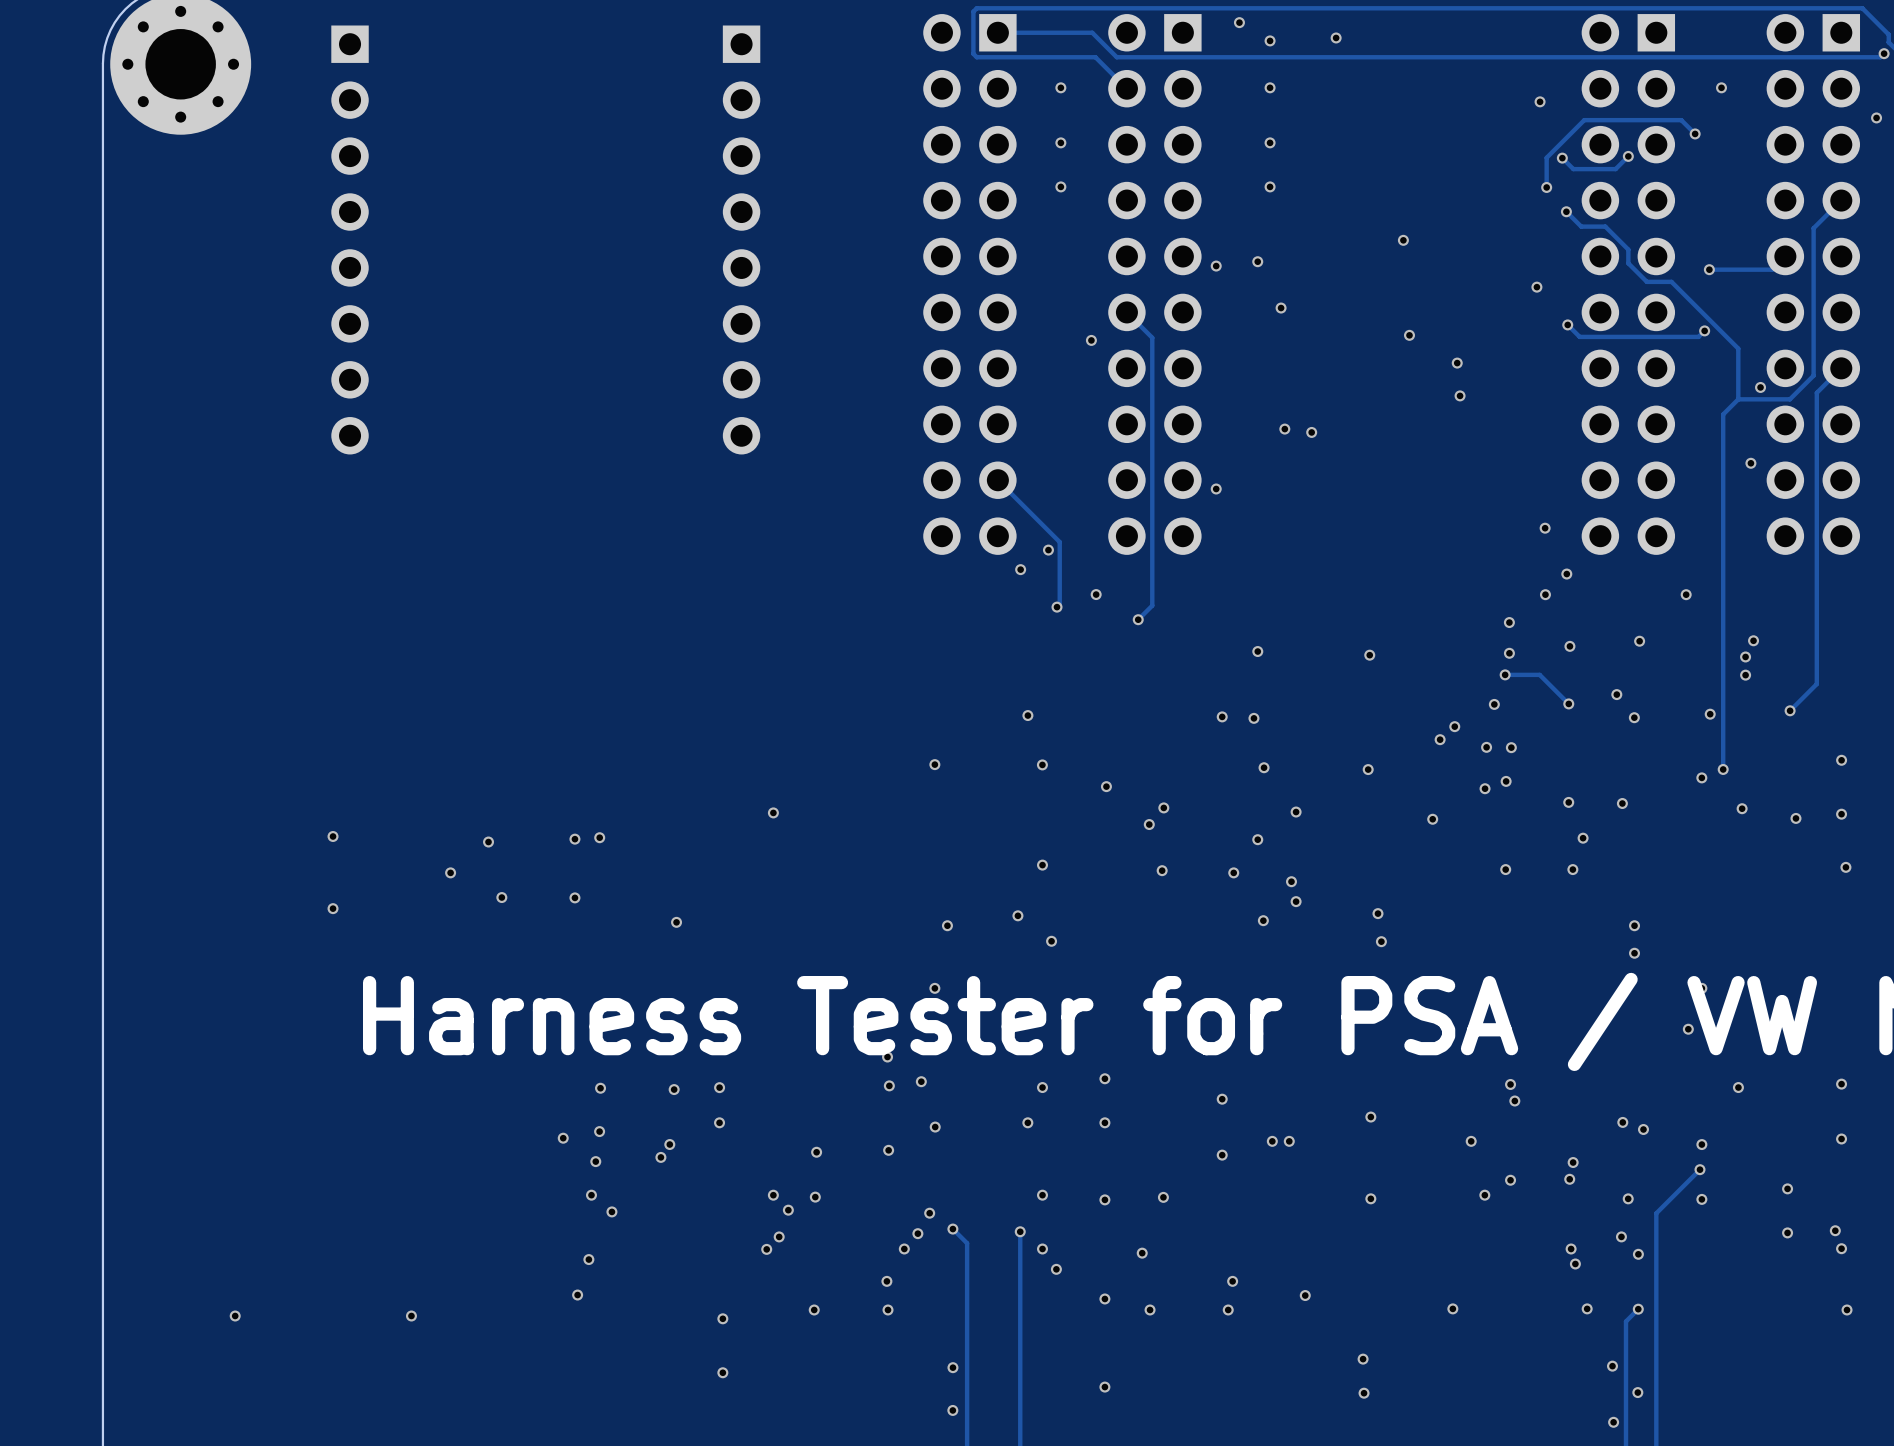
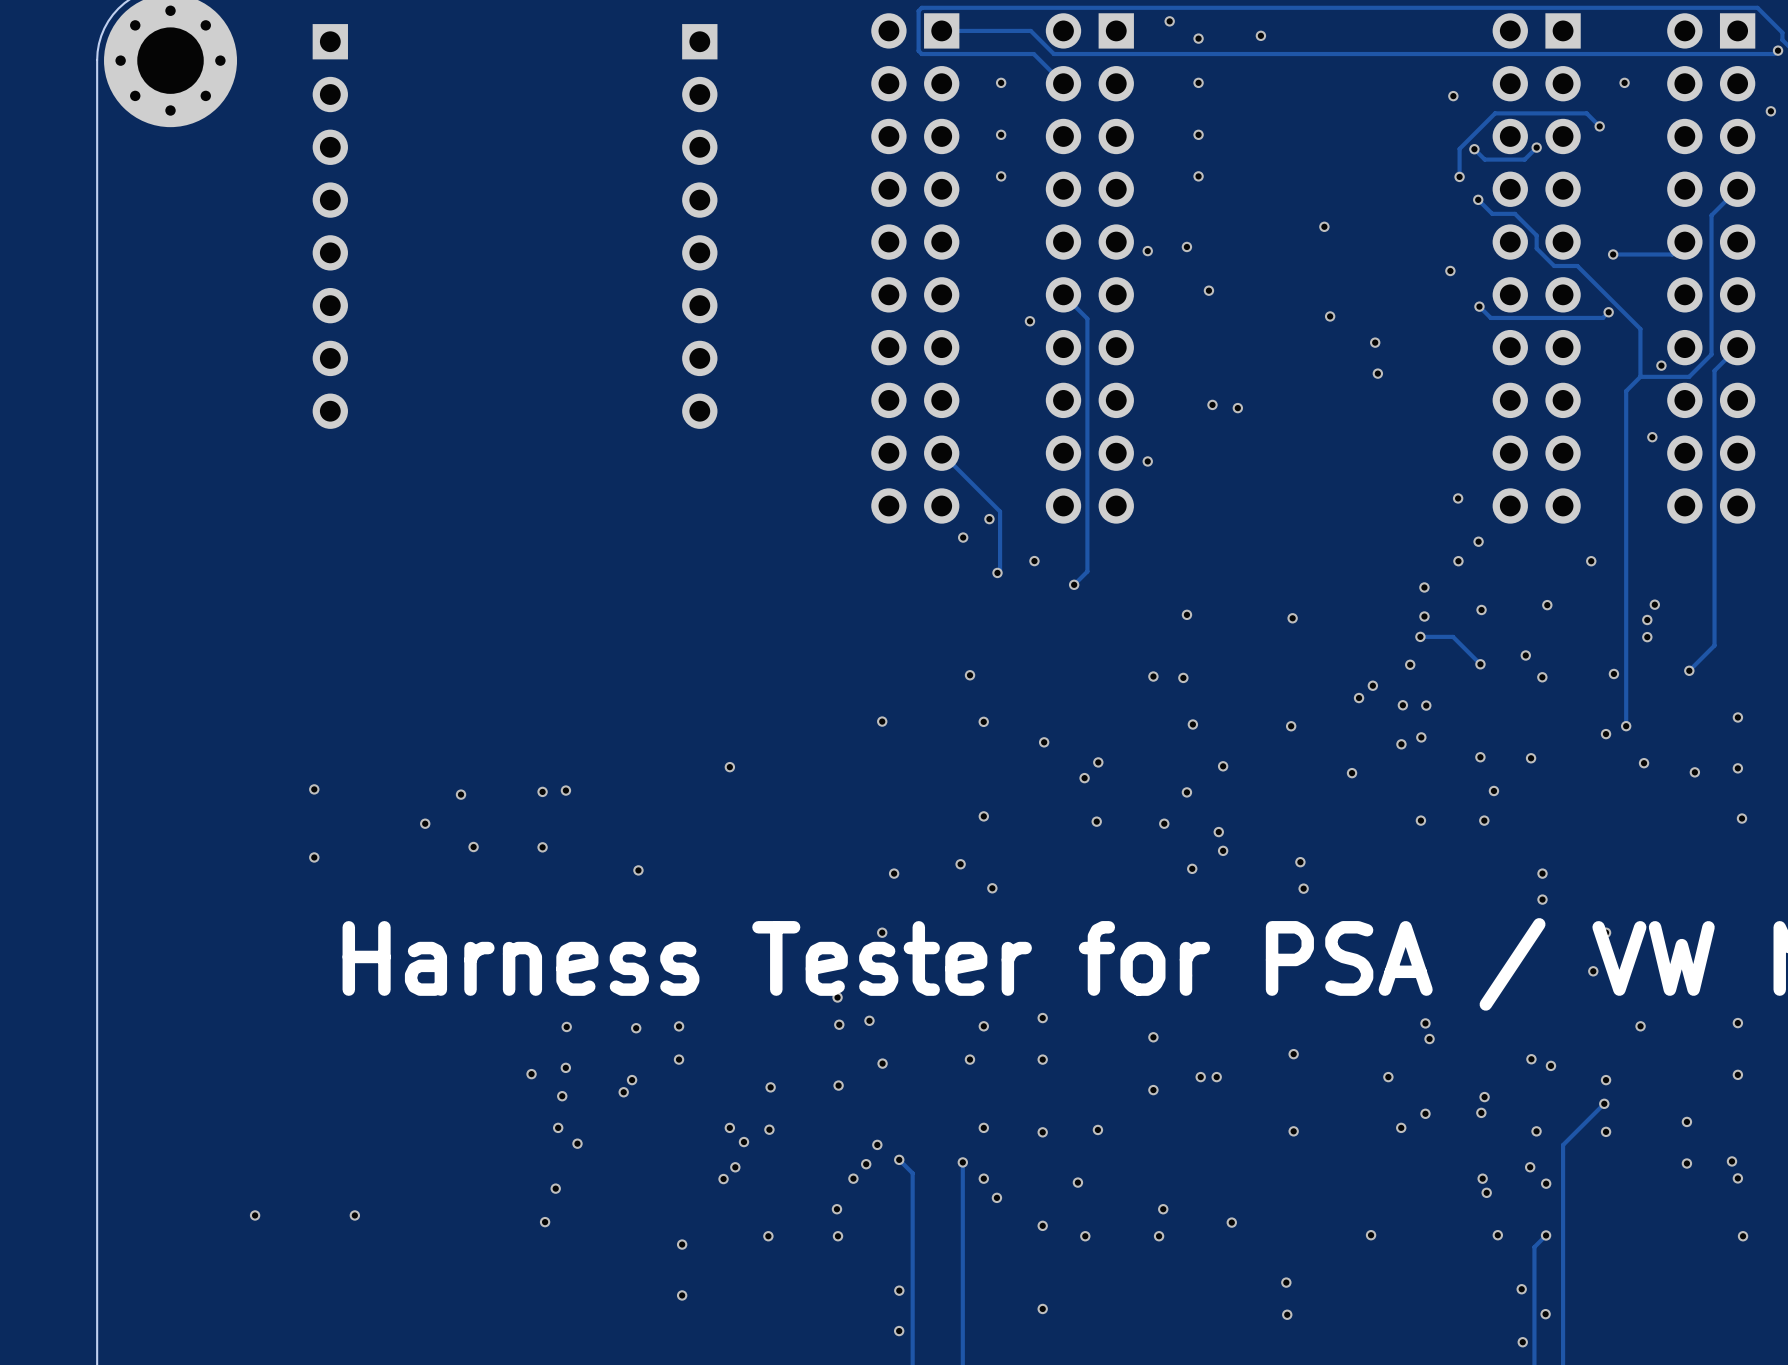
via position: (235, 1316) -> (255, 1215)
via position: (411, 1316) -> (354, 1215)

